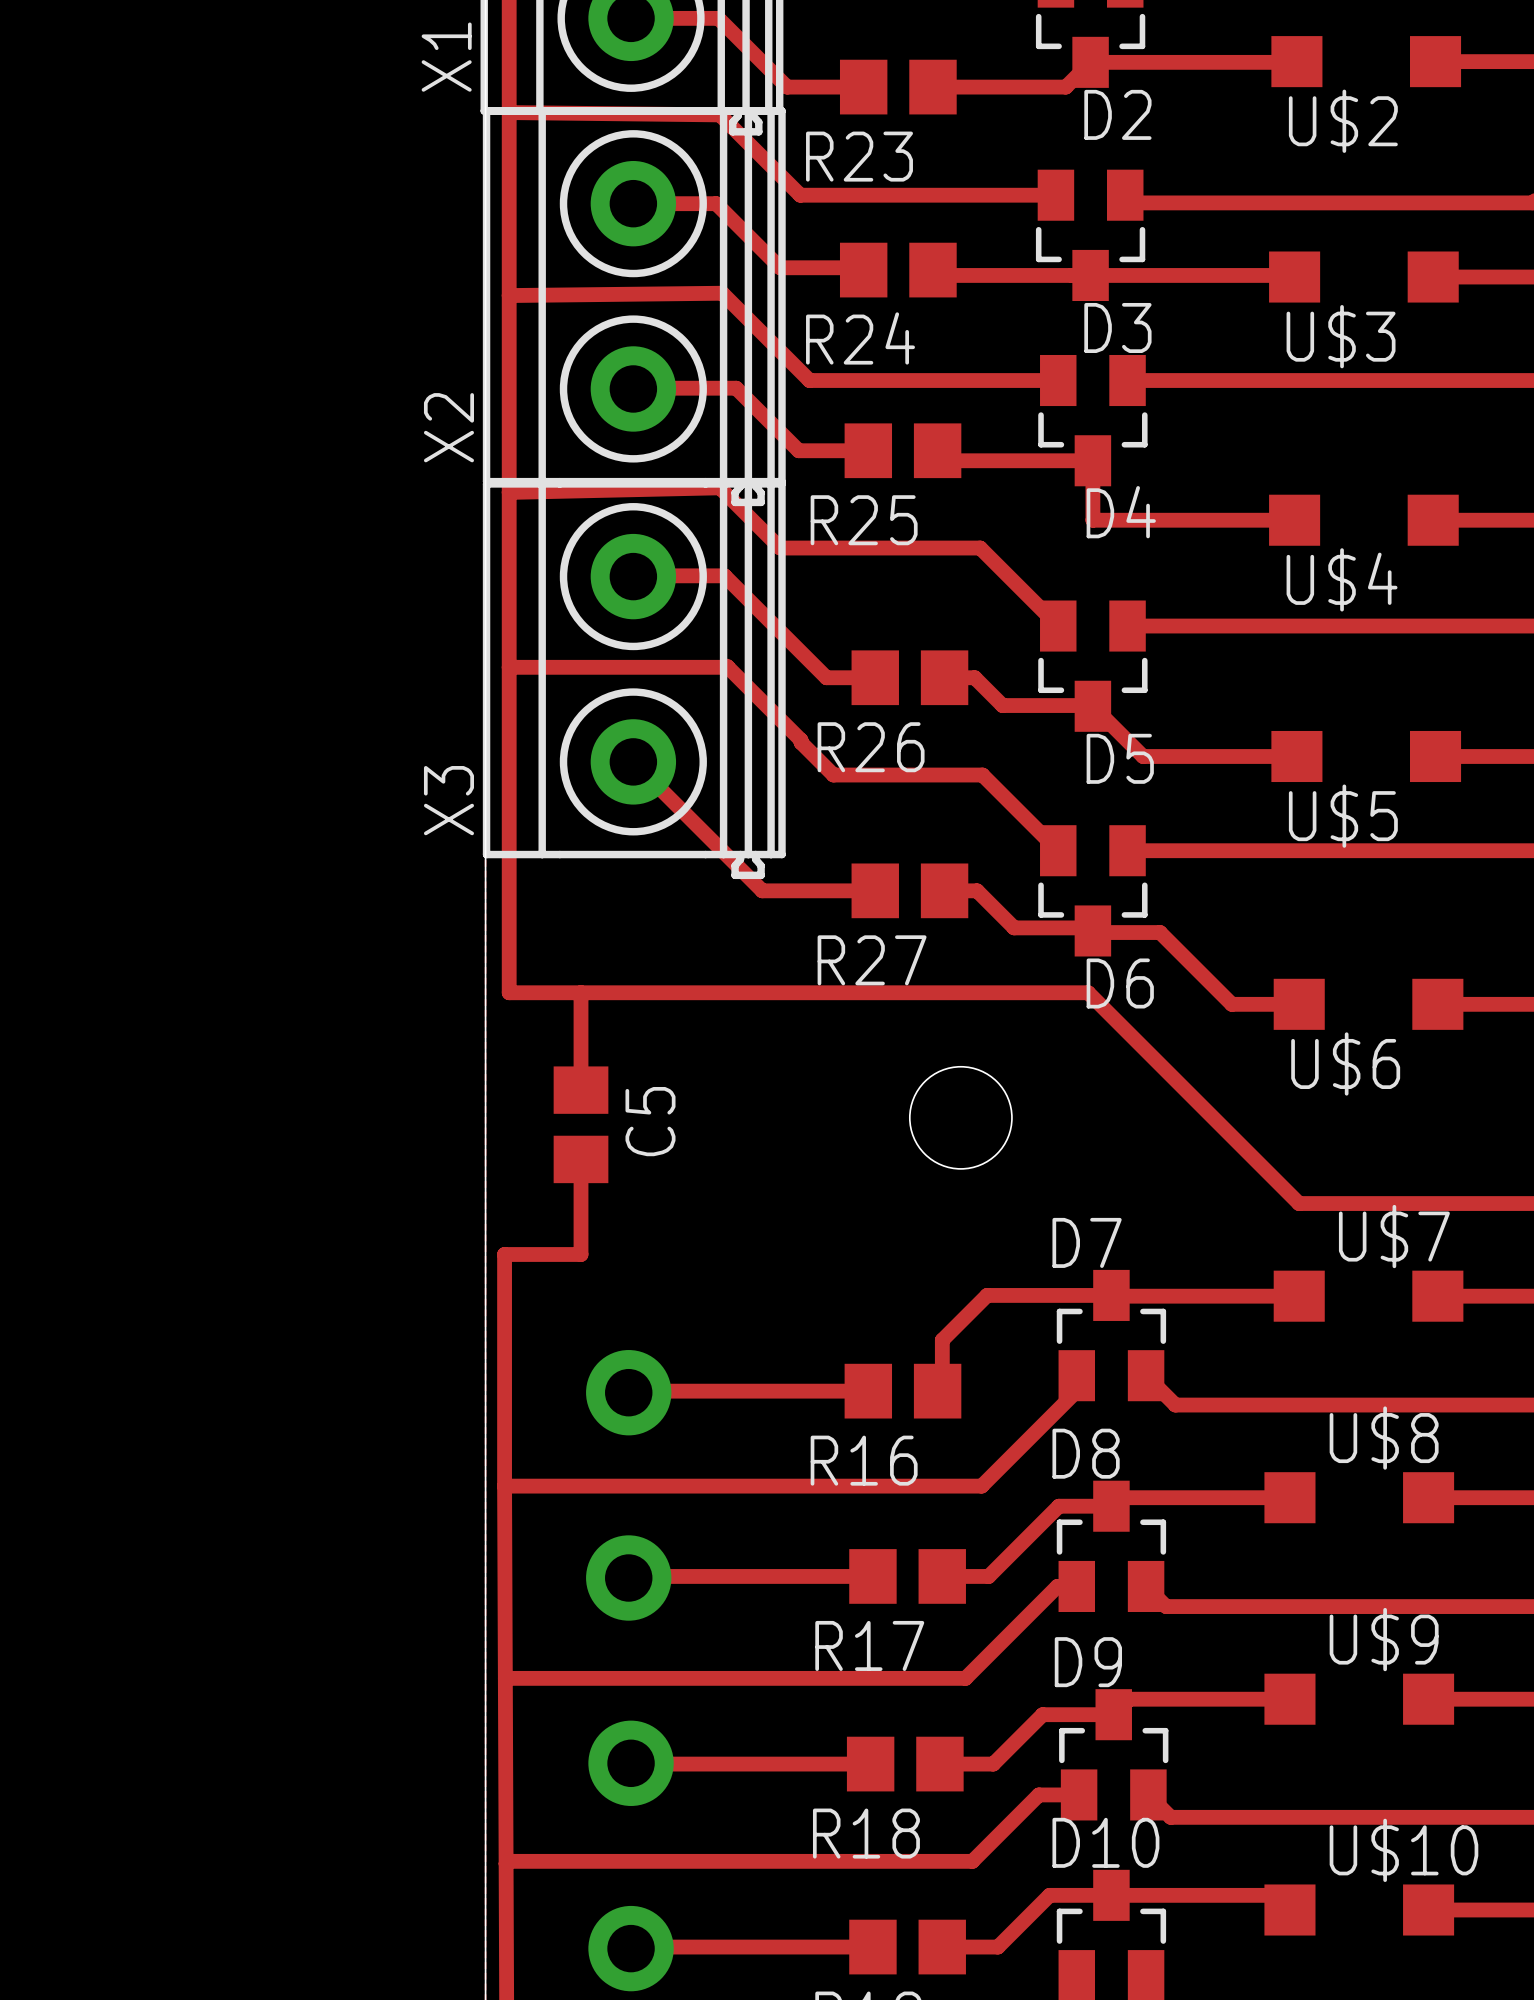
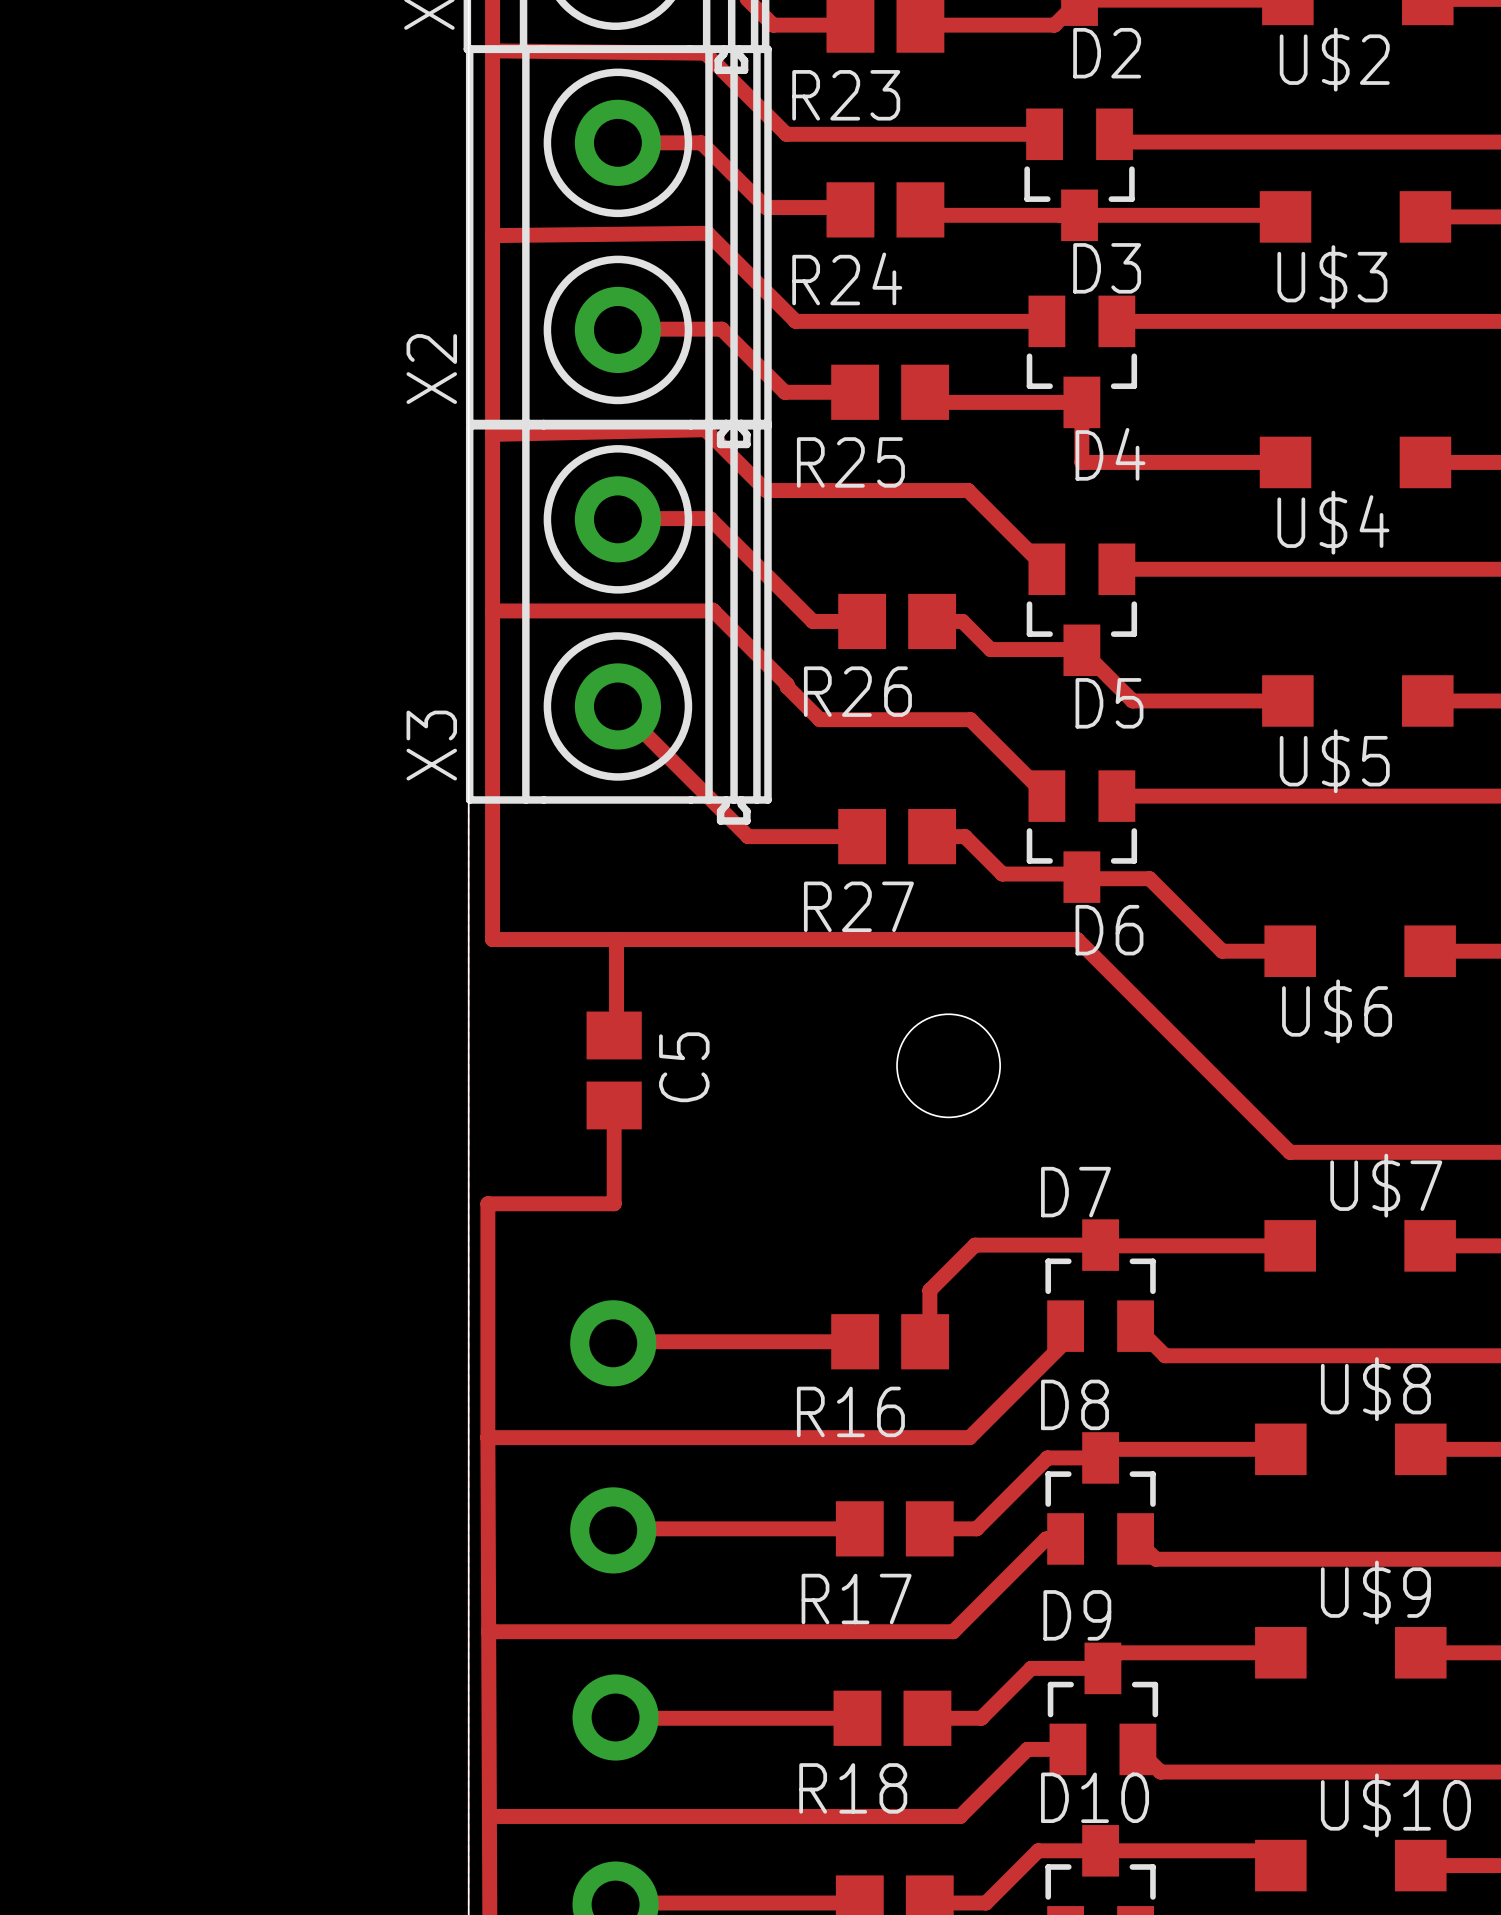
top track: (581, 992) (581, 1090) -> none
top track: none -> (616, 939) (616, 1035) (614, 1035)
C5 position: (581, 1124) -> (614, 1070)
top track: (581, 1159) (581, 1254) -> (614, 1105) (614, 1203) (565, 1203)

